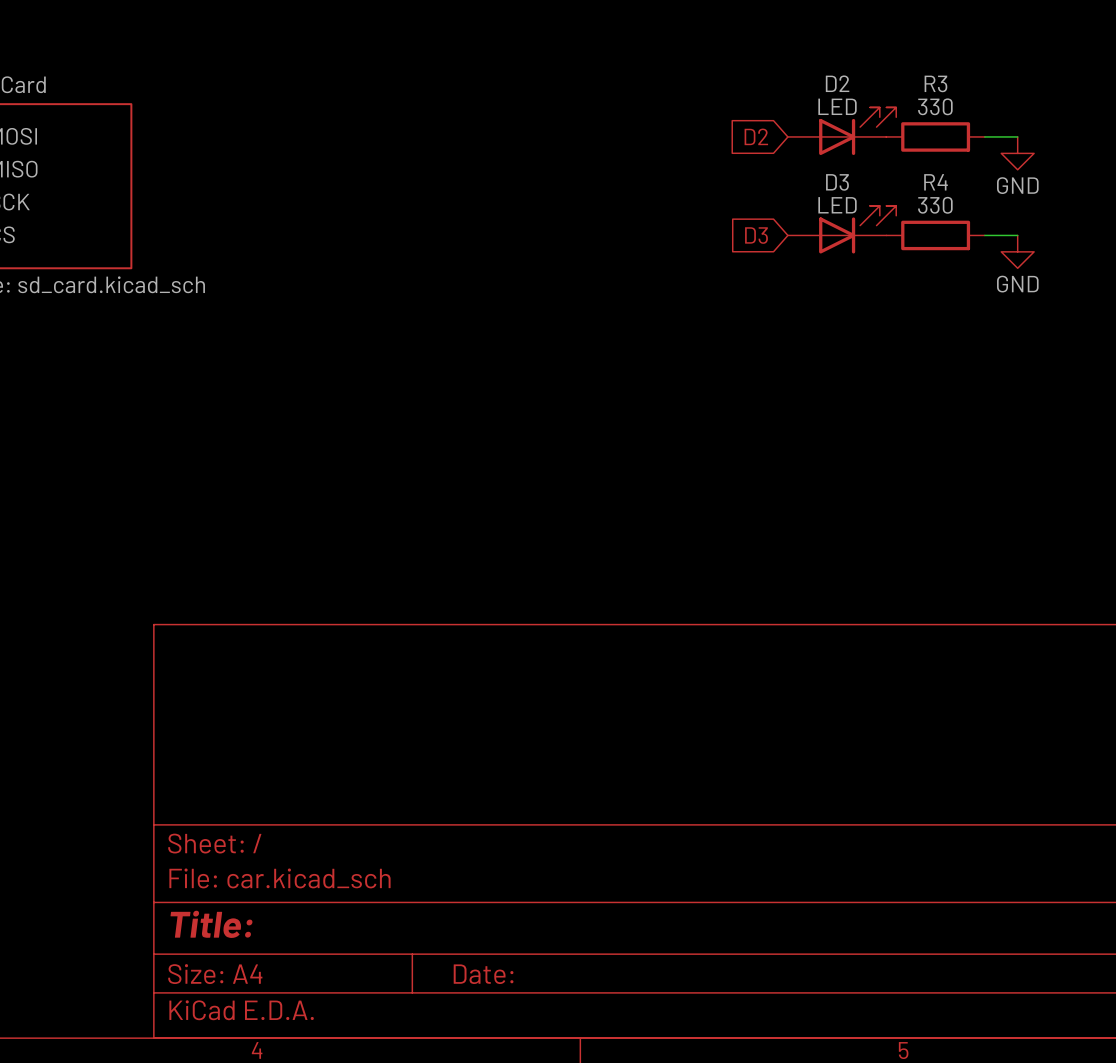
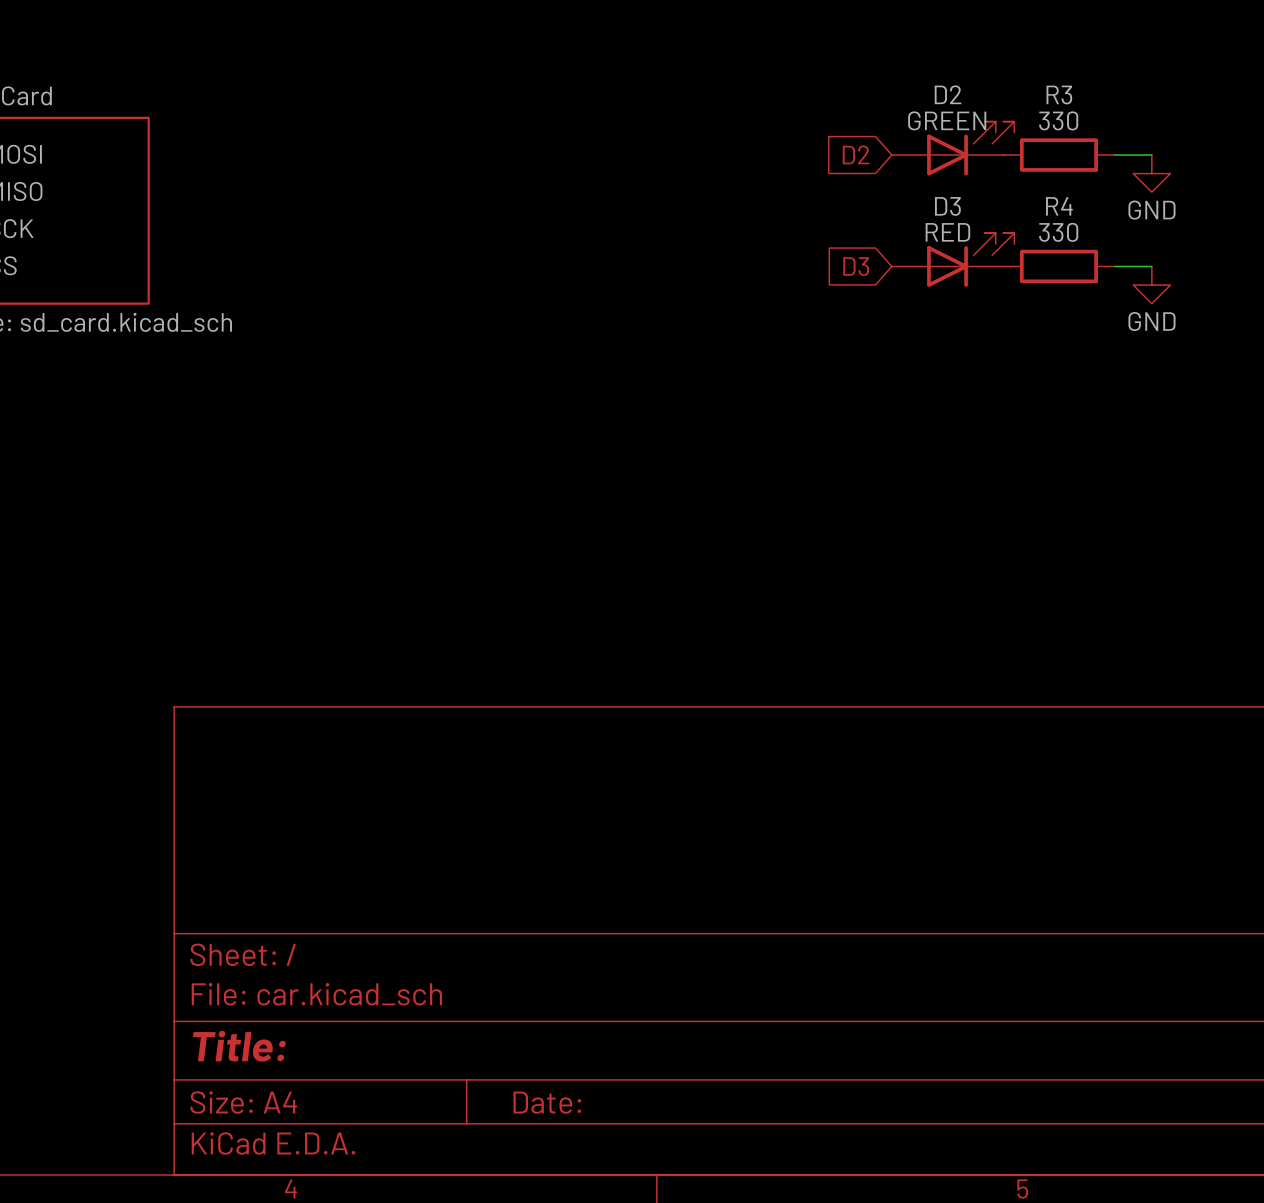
D2 value: LED (837, 106) -> GREEN (947, 120)
D3 value: LED (837, 205) -> RED (947, 232)

